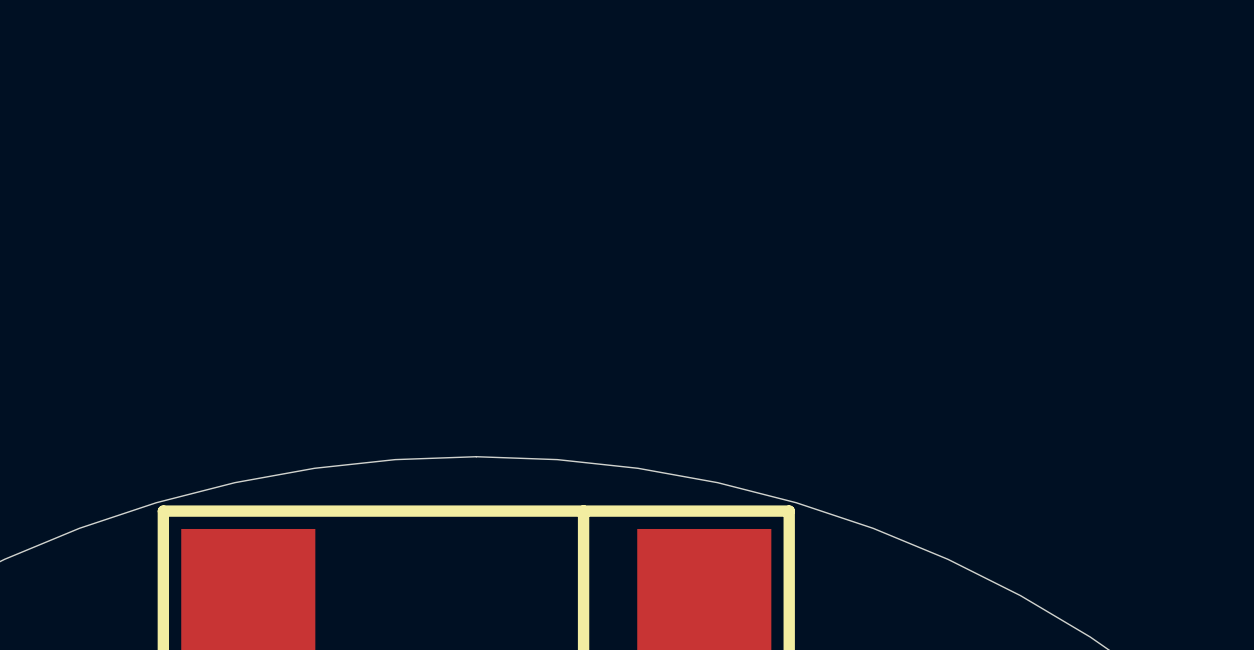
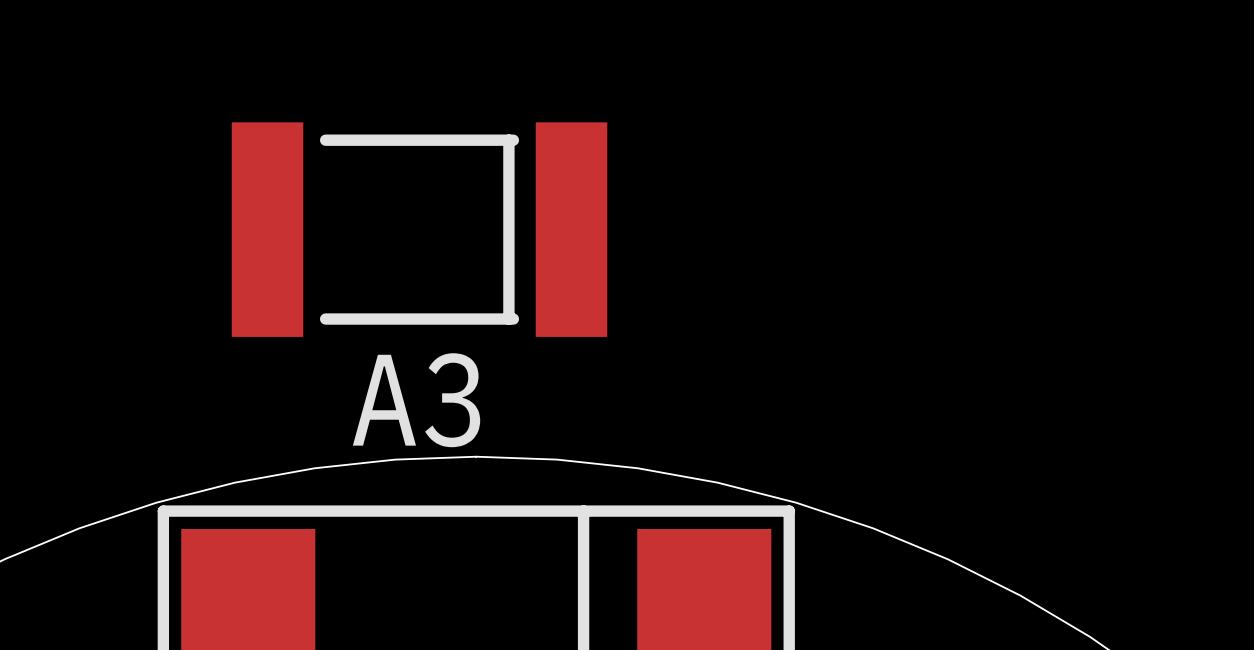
A3: none -> (419, 229)

